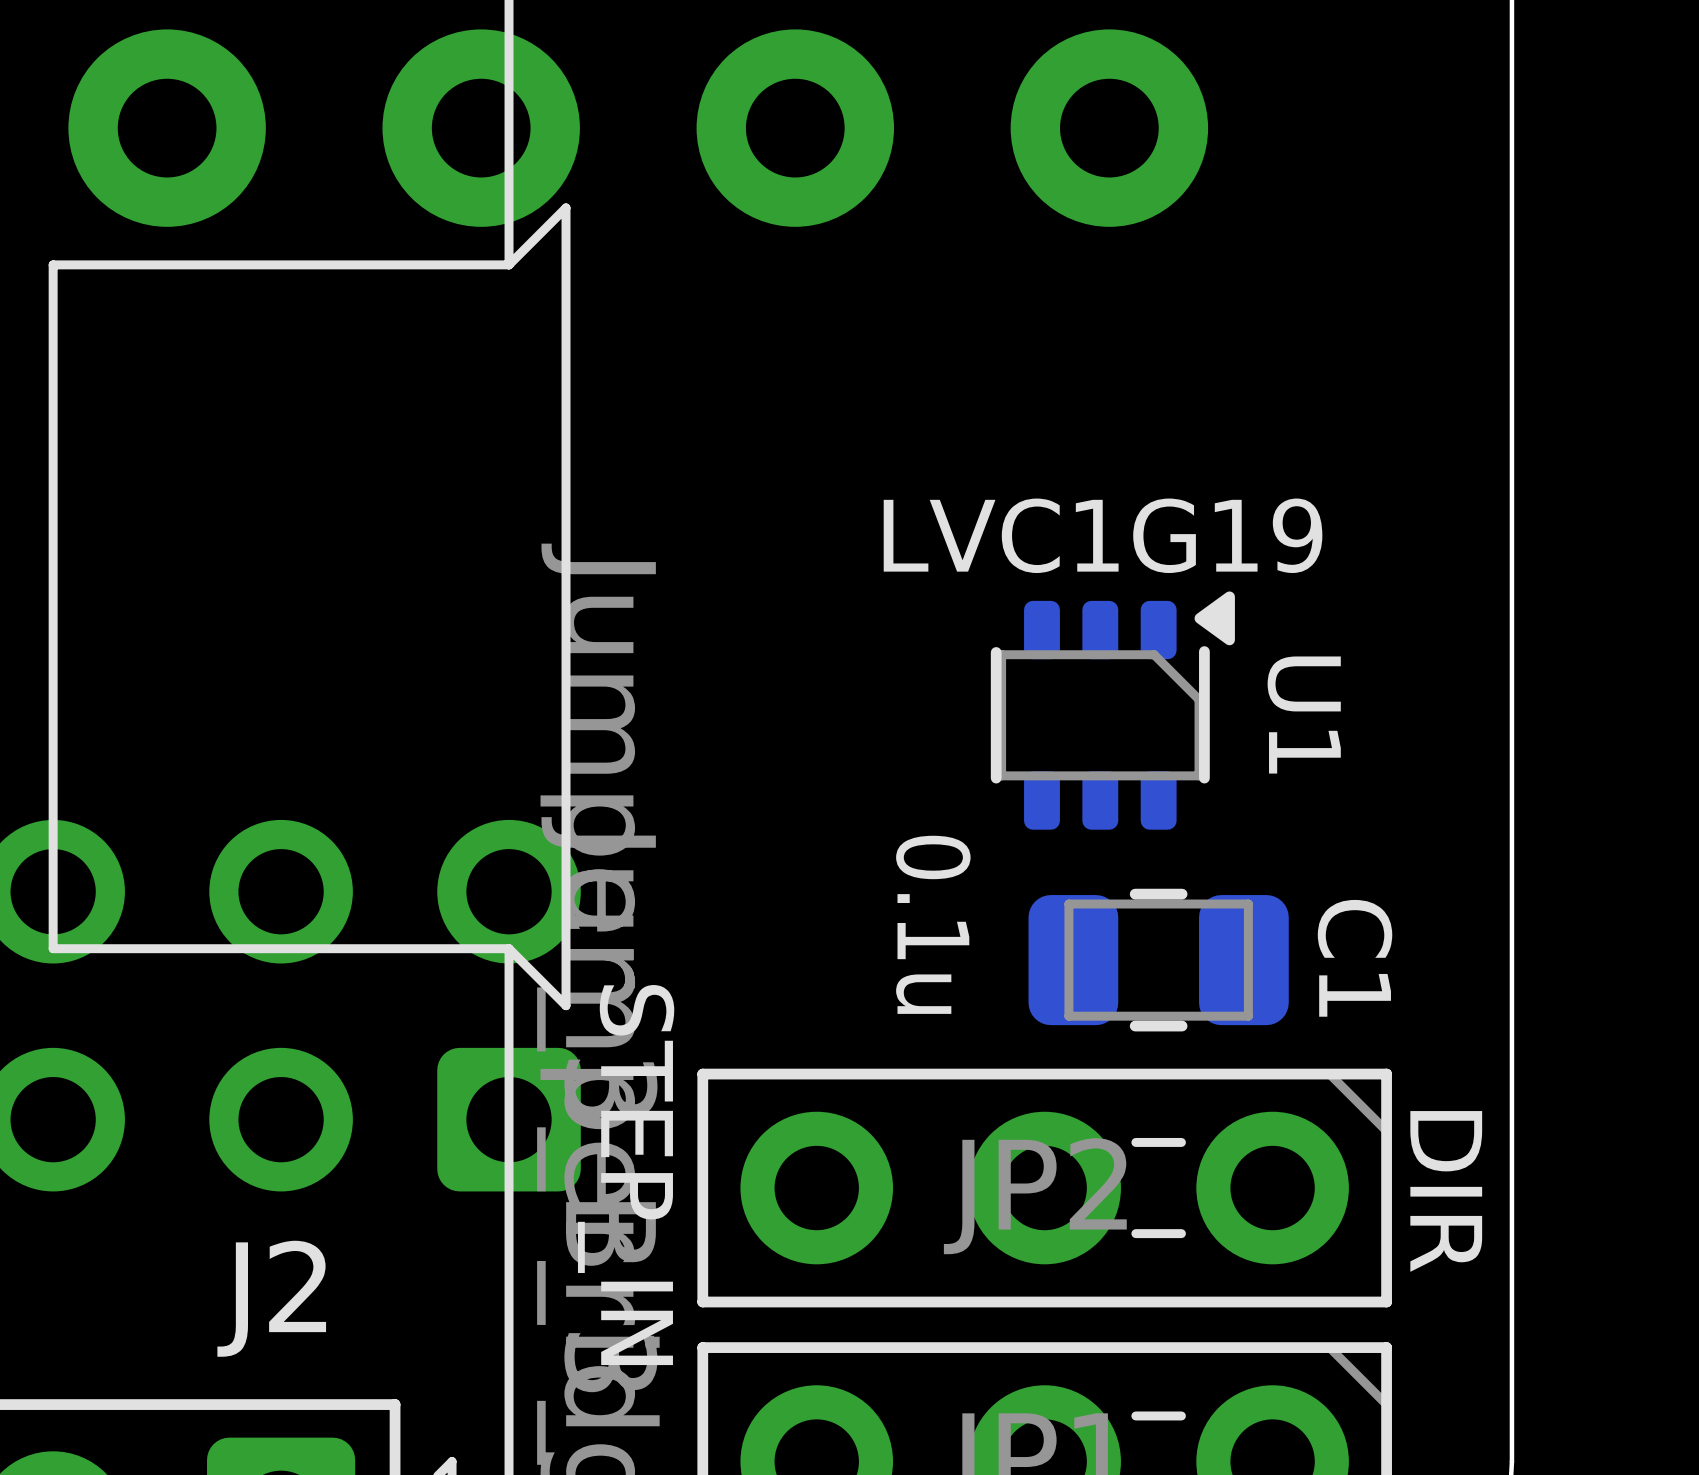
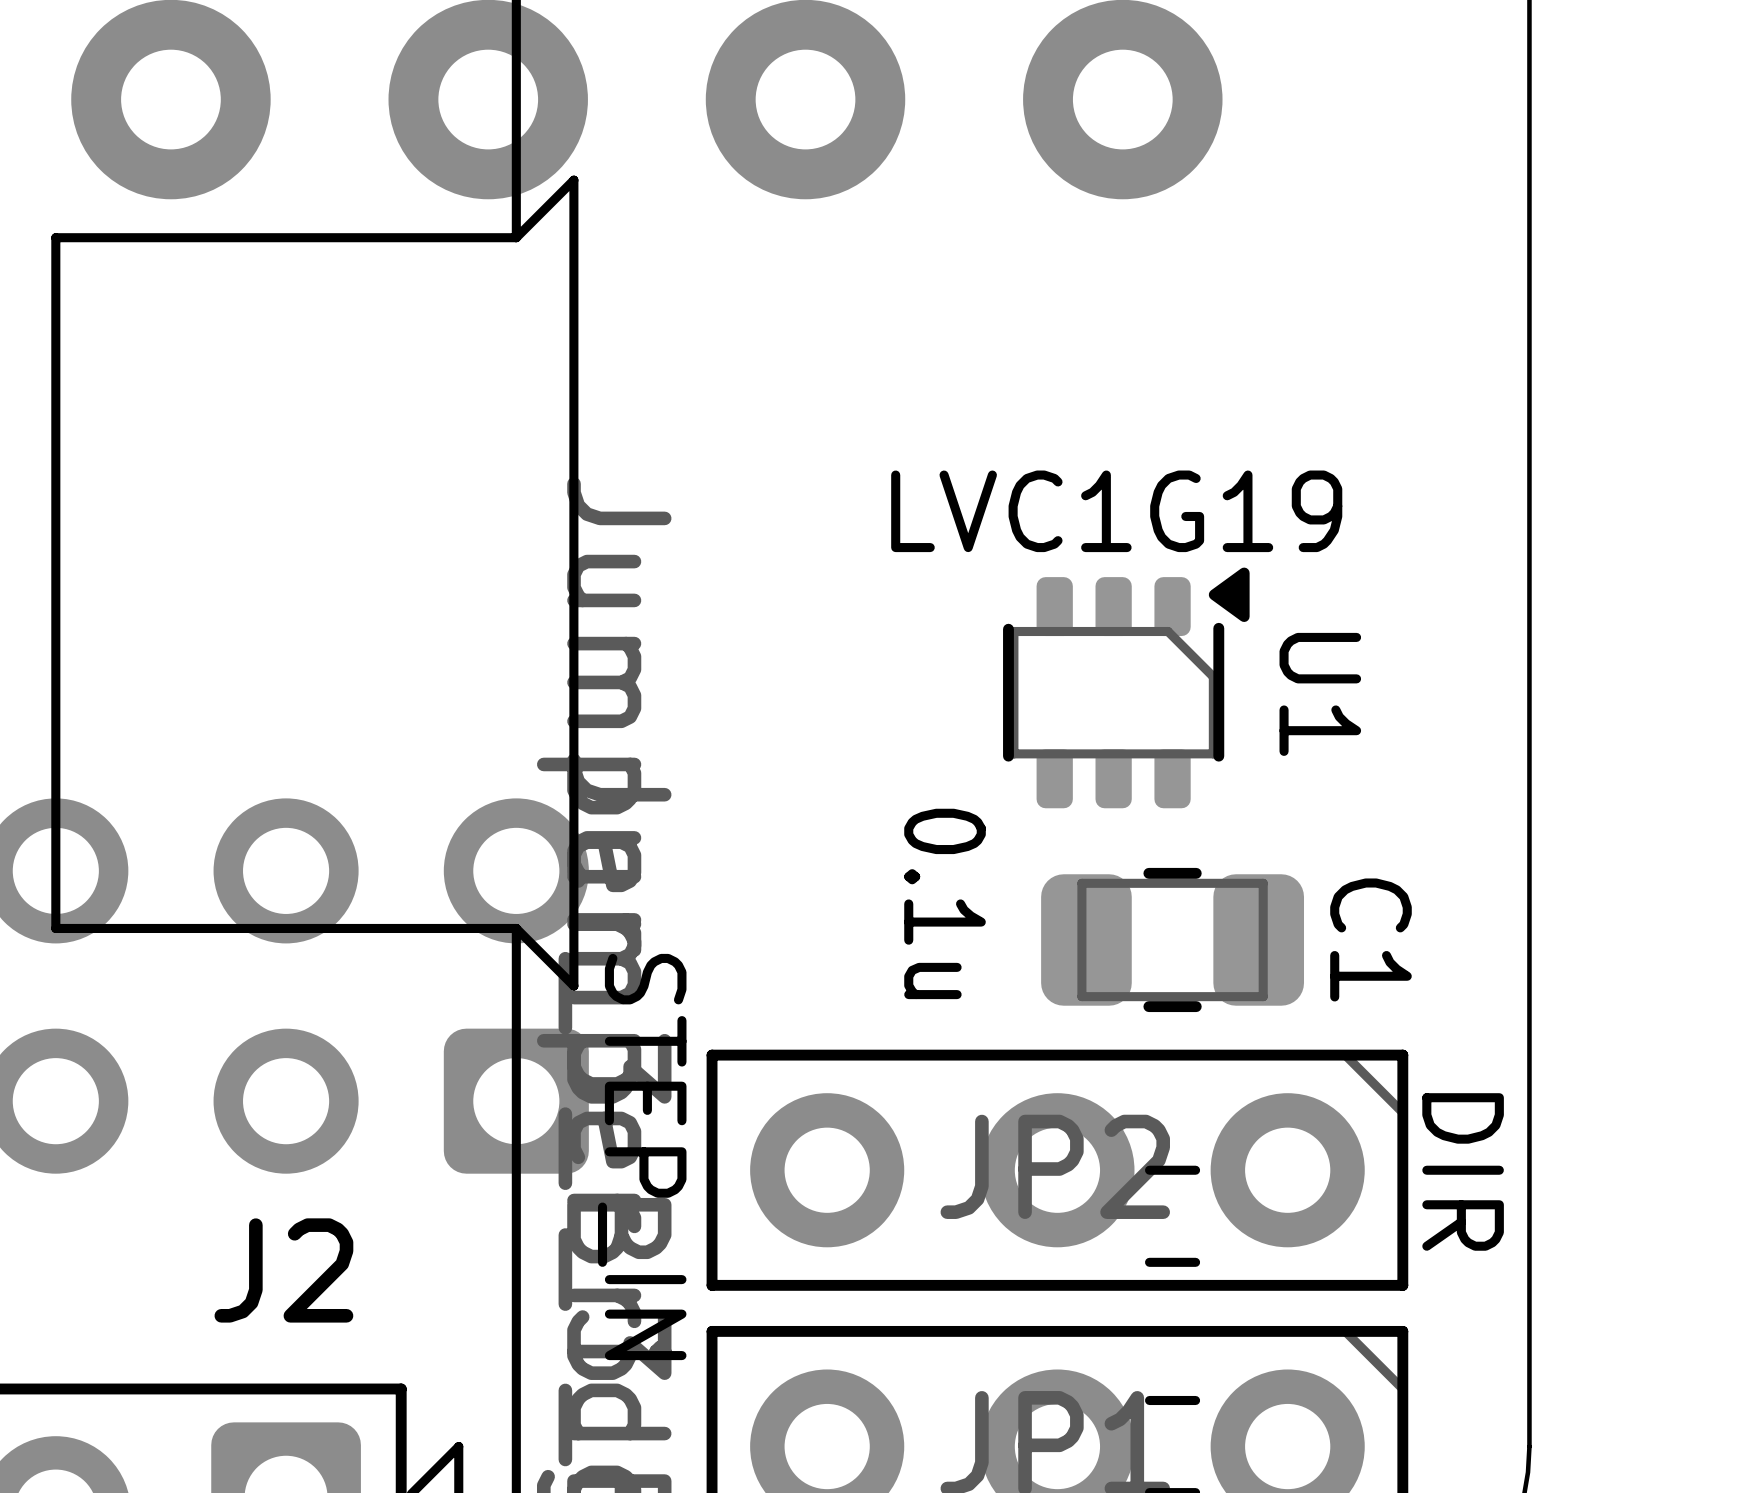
line: (1181, 1142) (1135, 1142) -> (1195, 1170) (1149, 1170)
line: (1181, 1233) (1135, 1233) -> (1195, 1262) (1149, 1262)

